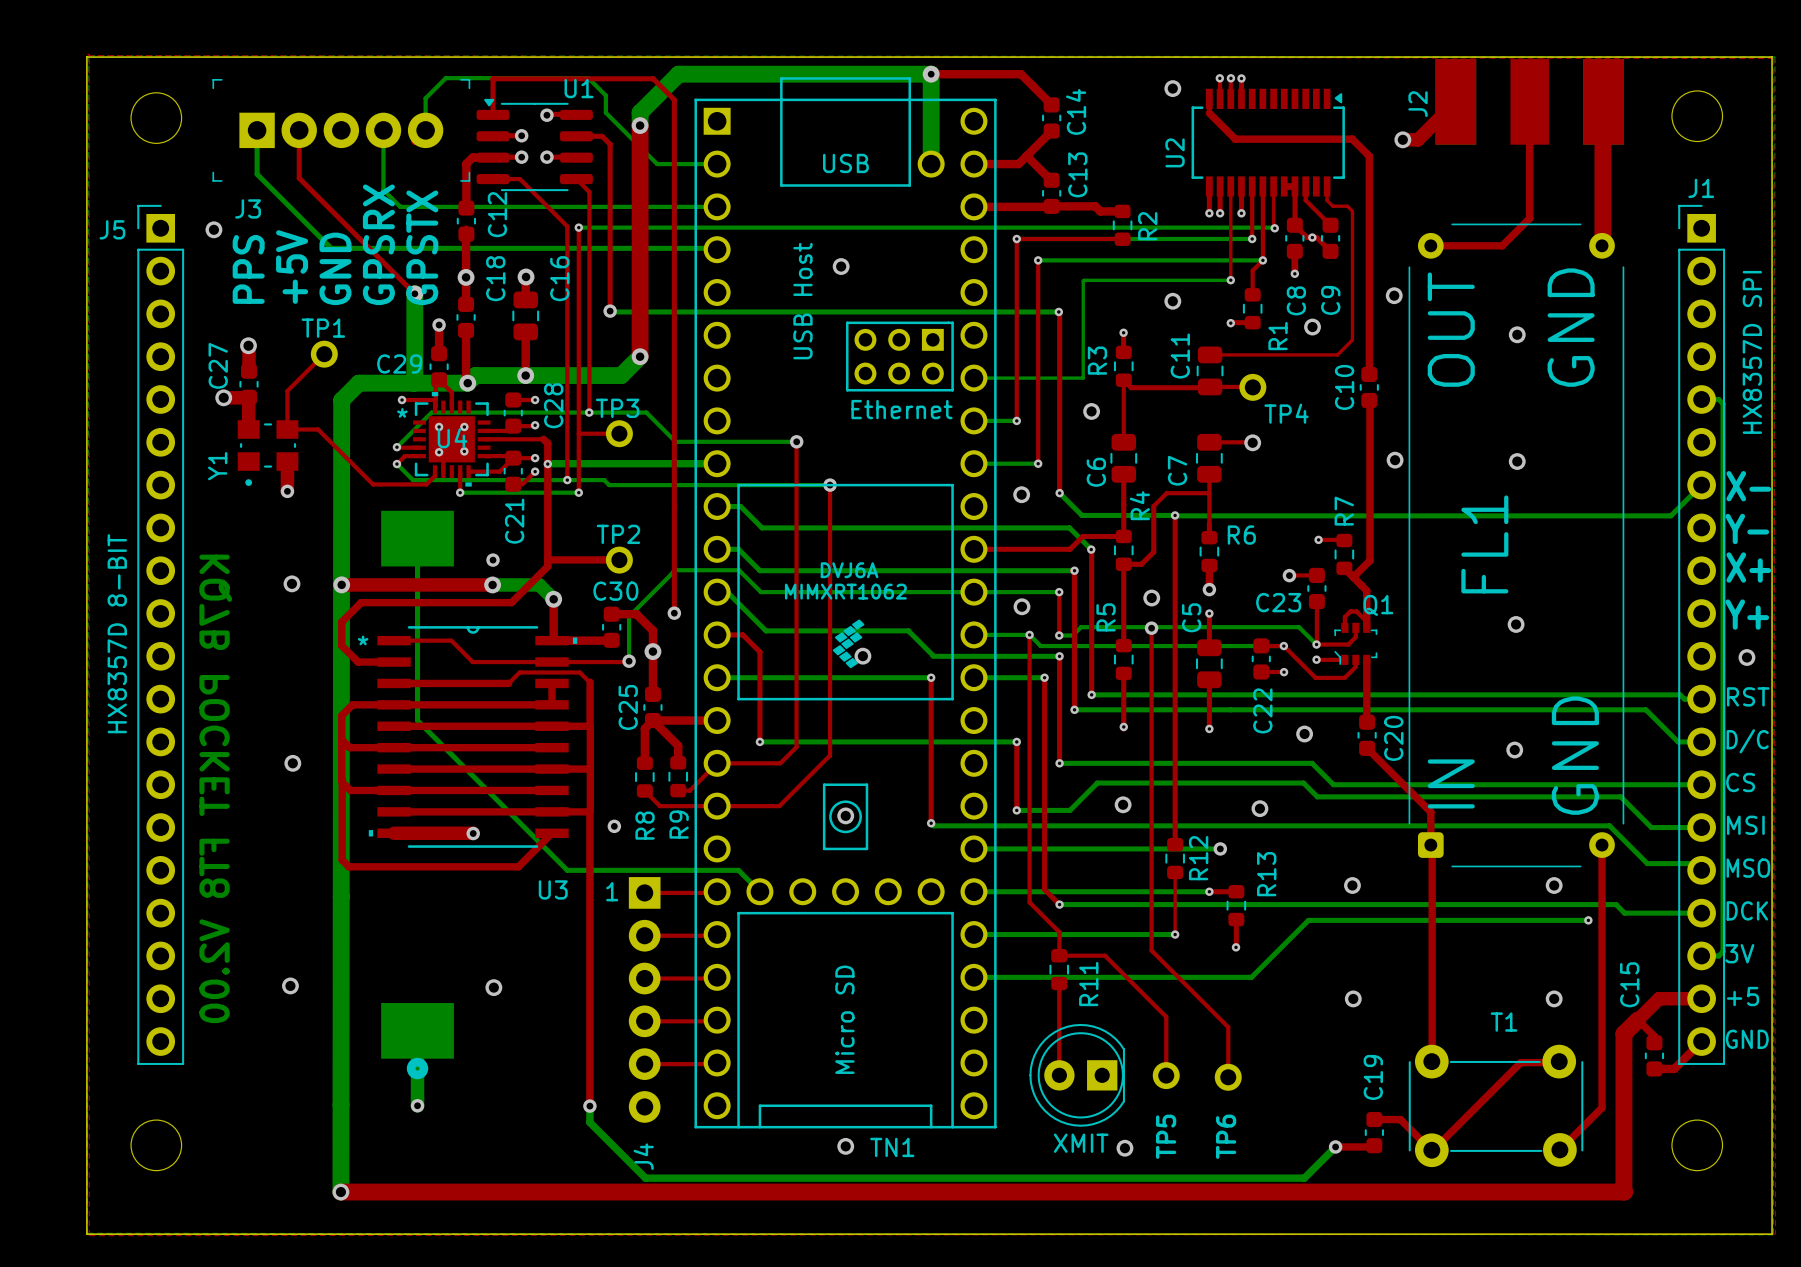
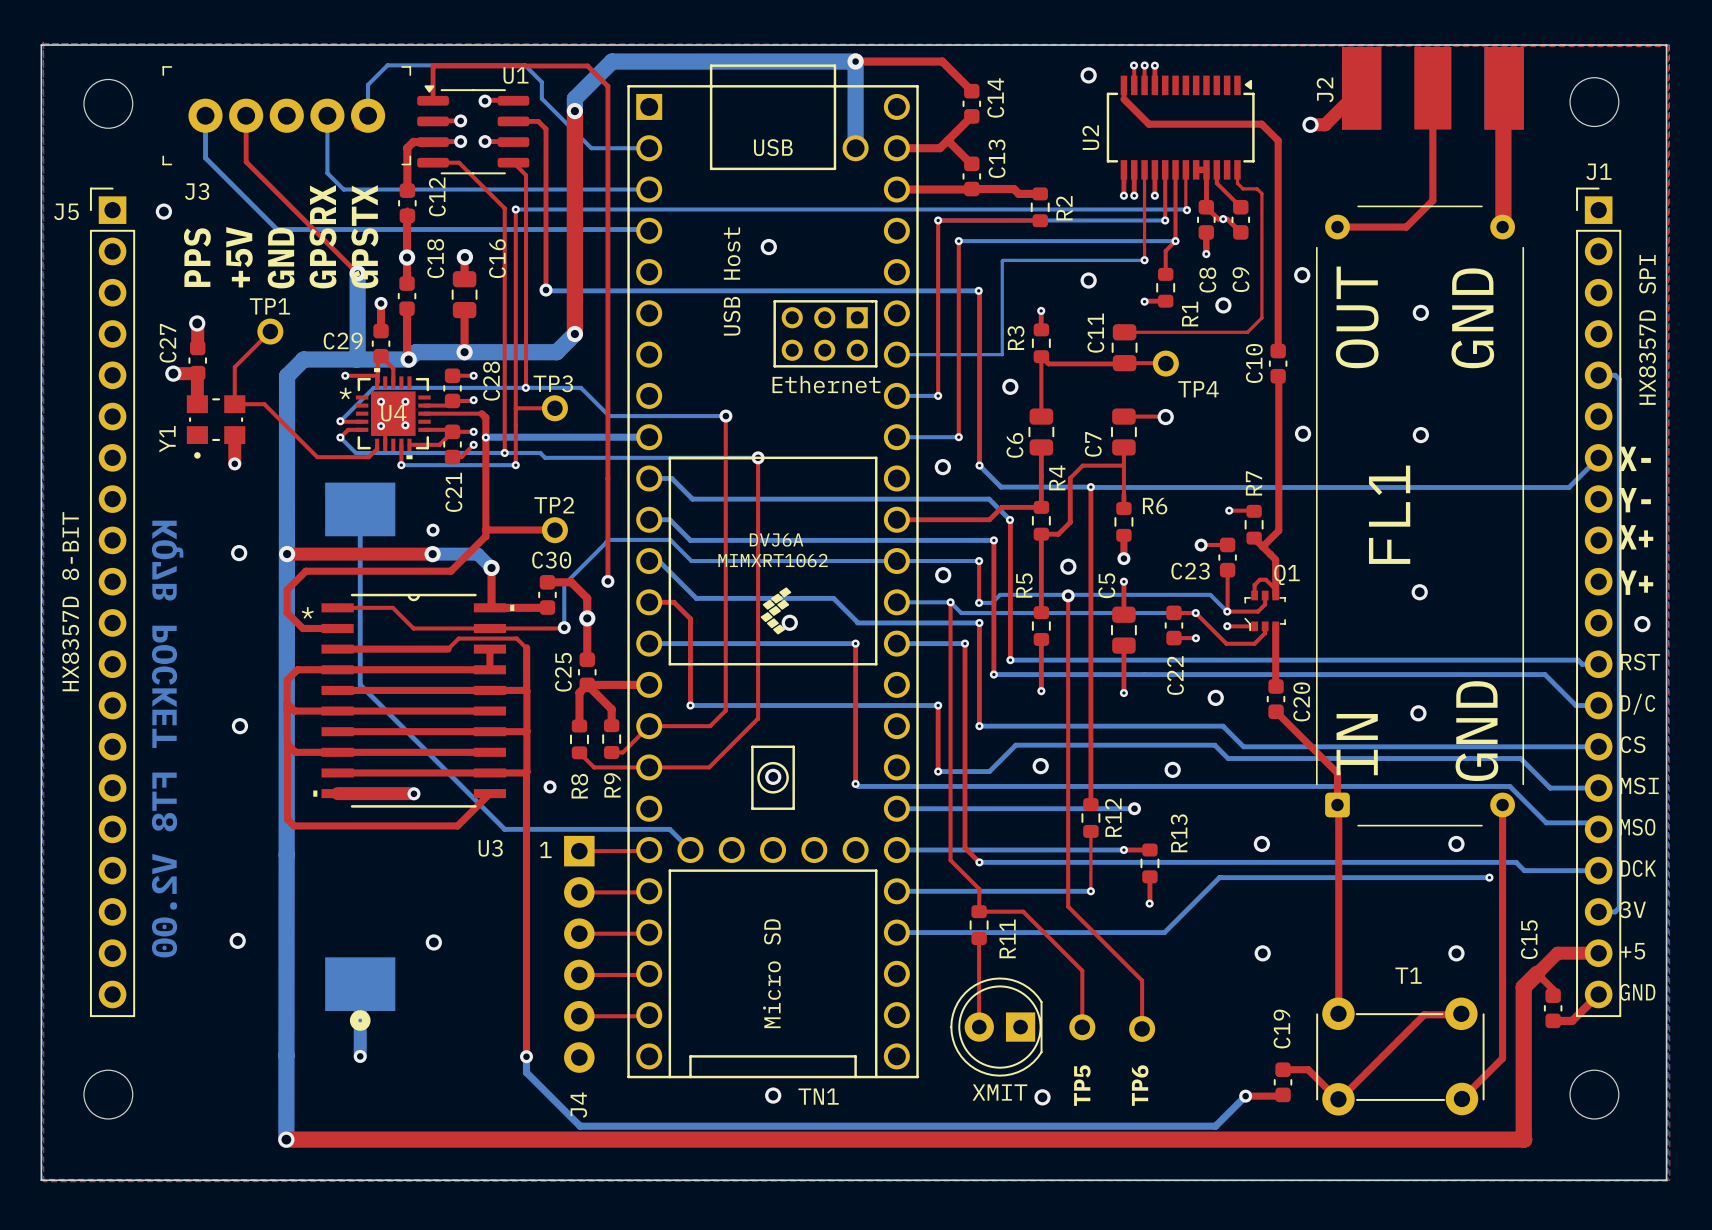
J3 footprint: [212, 78, 471, 182] -> [162, 66, 412, 166]

